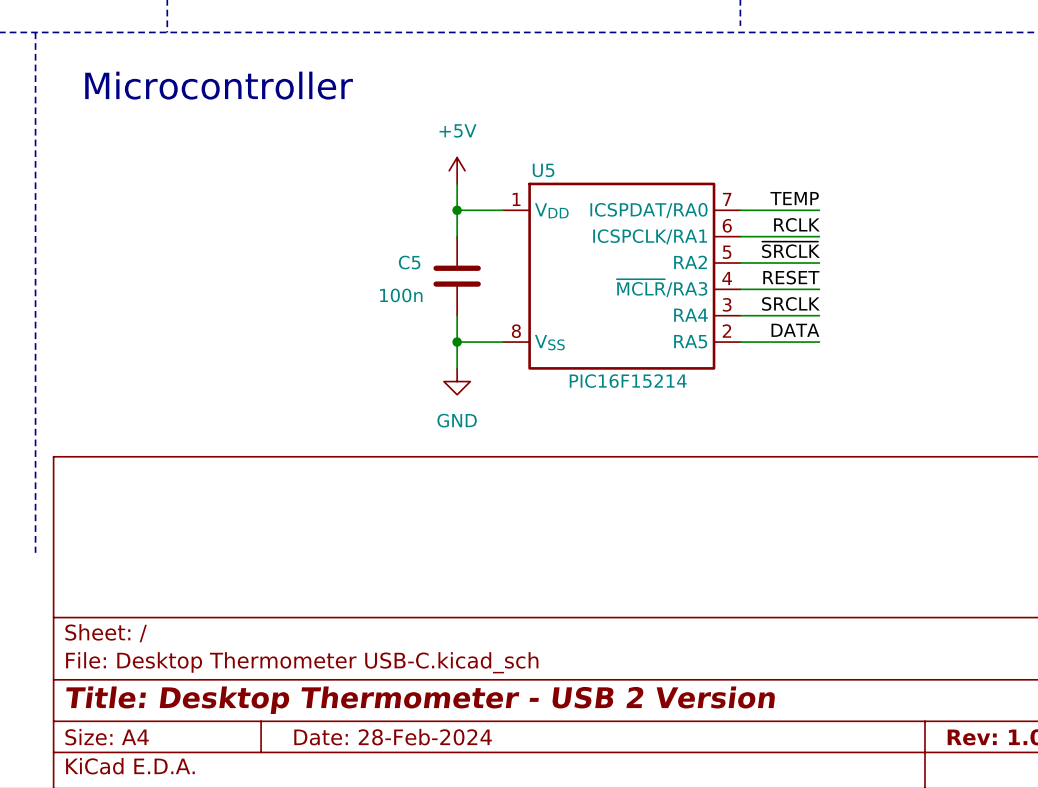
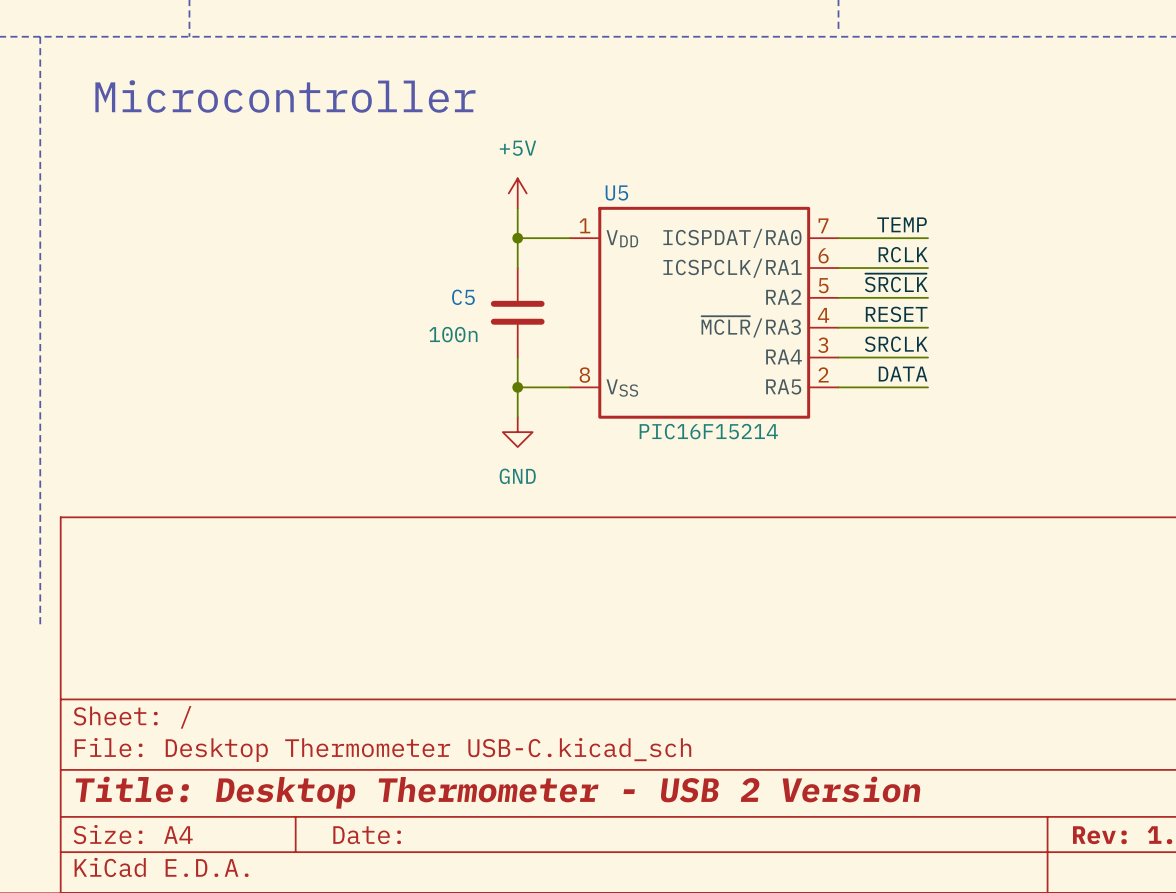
title block: Date: 28-Feb-2024 (393, 737) -> Date: (367, 835)

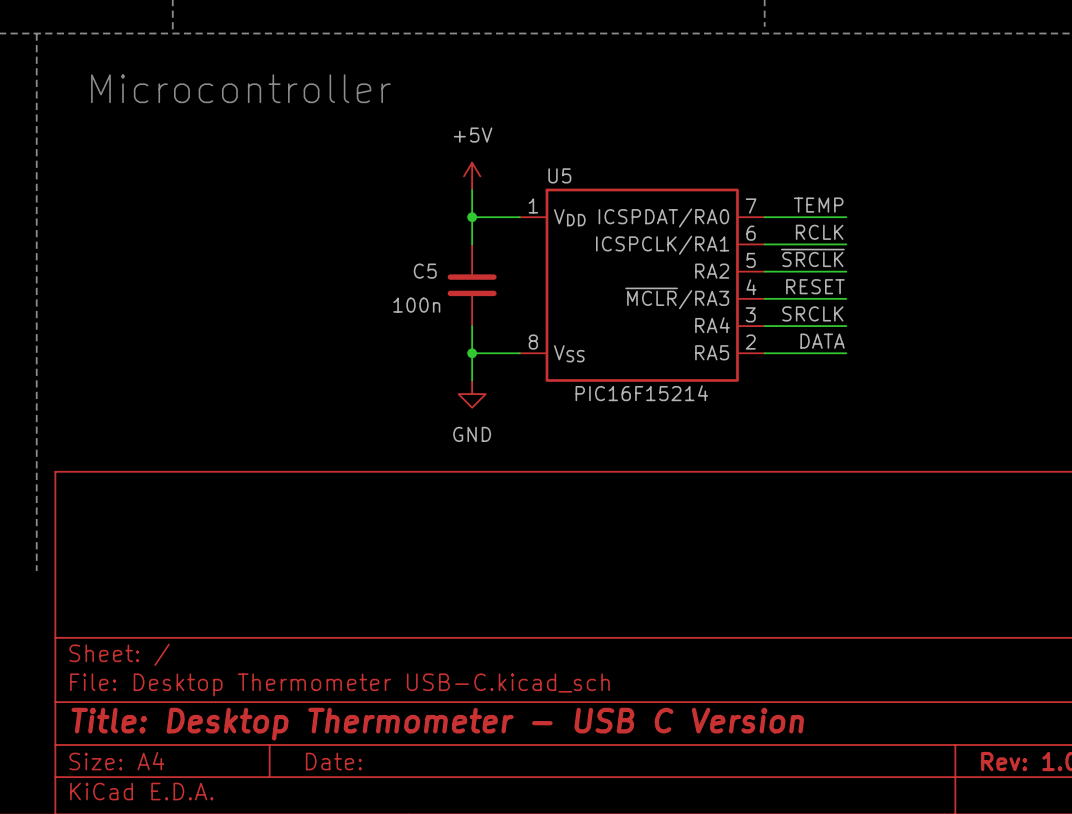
title block: Title: Desktop Thermometer - USB 2 Version (498, 792) -> Title: Desktop Thermometer - USB C Version (437, 724)

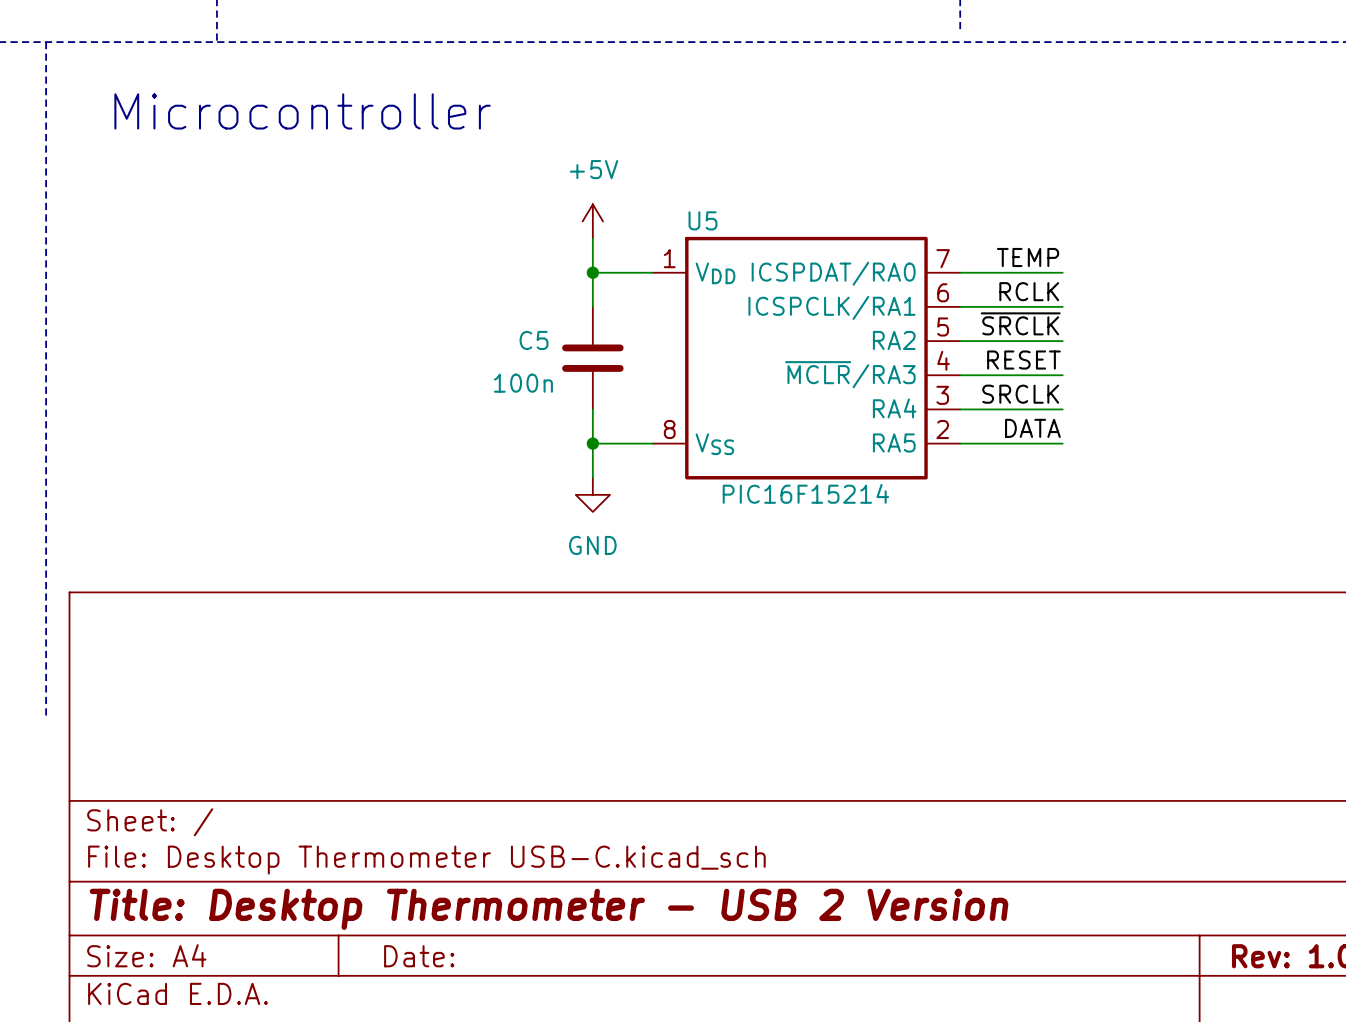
title block: Title: Desktop Thermometer - USB C Version (437, 724) -> Title: Desktop Thermometer - USB 2 Version (549, 909)

